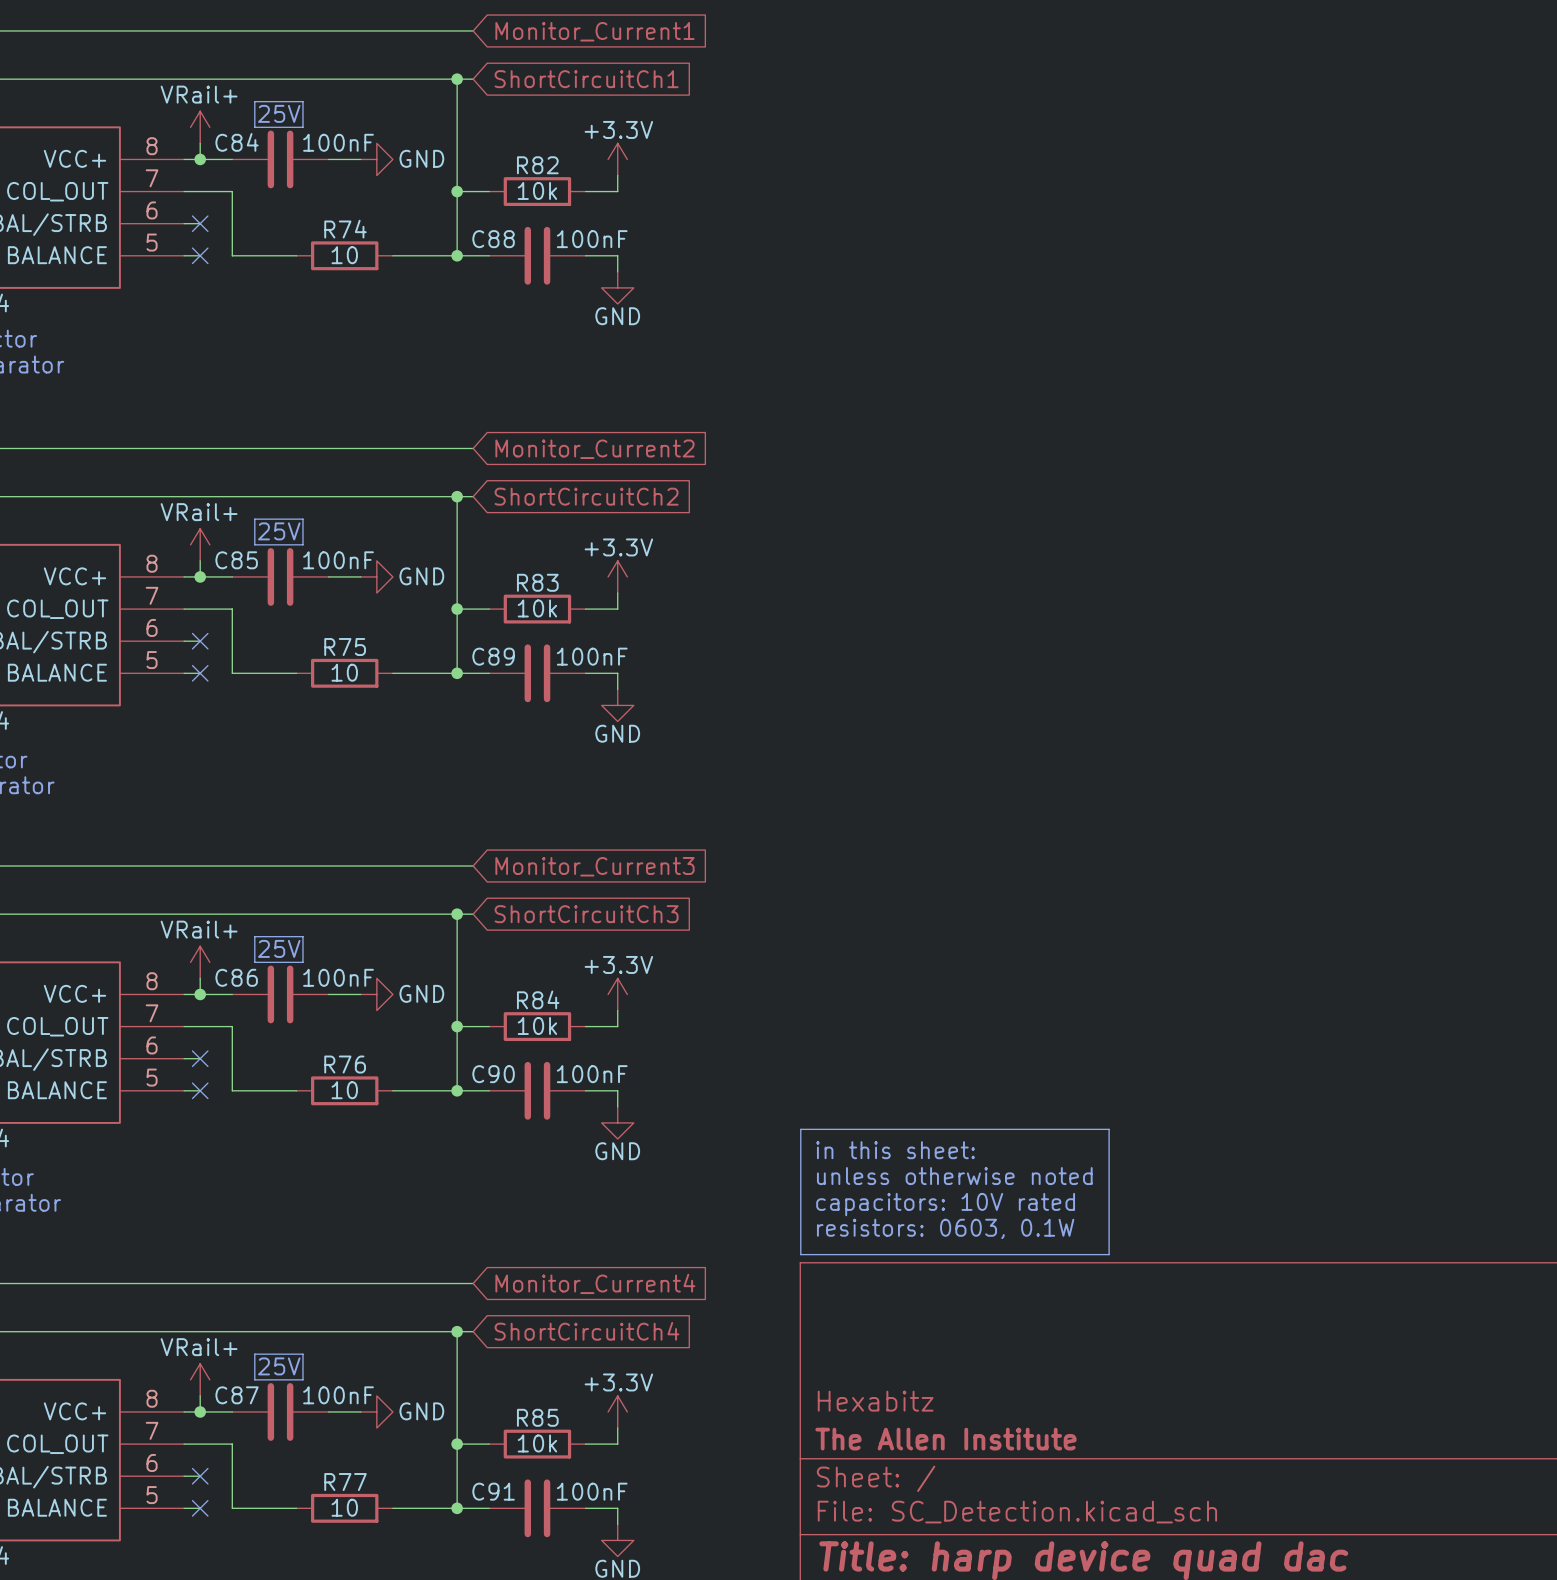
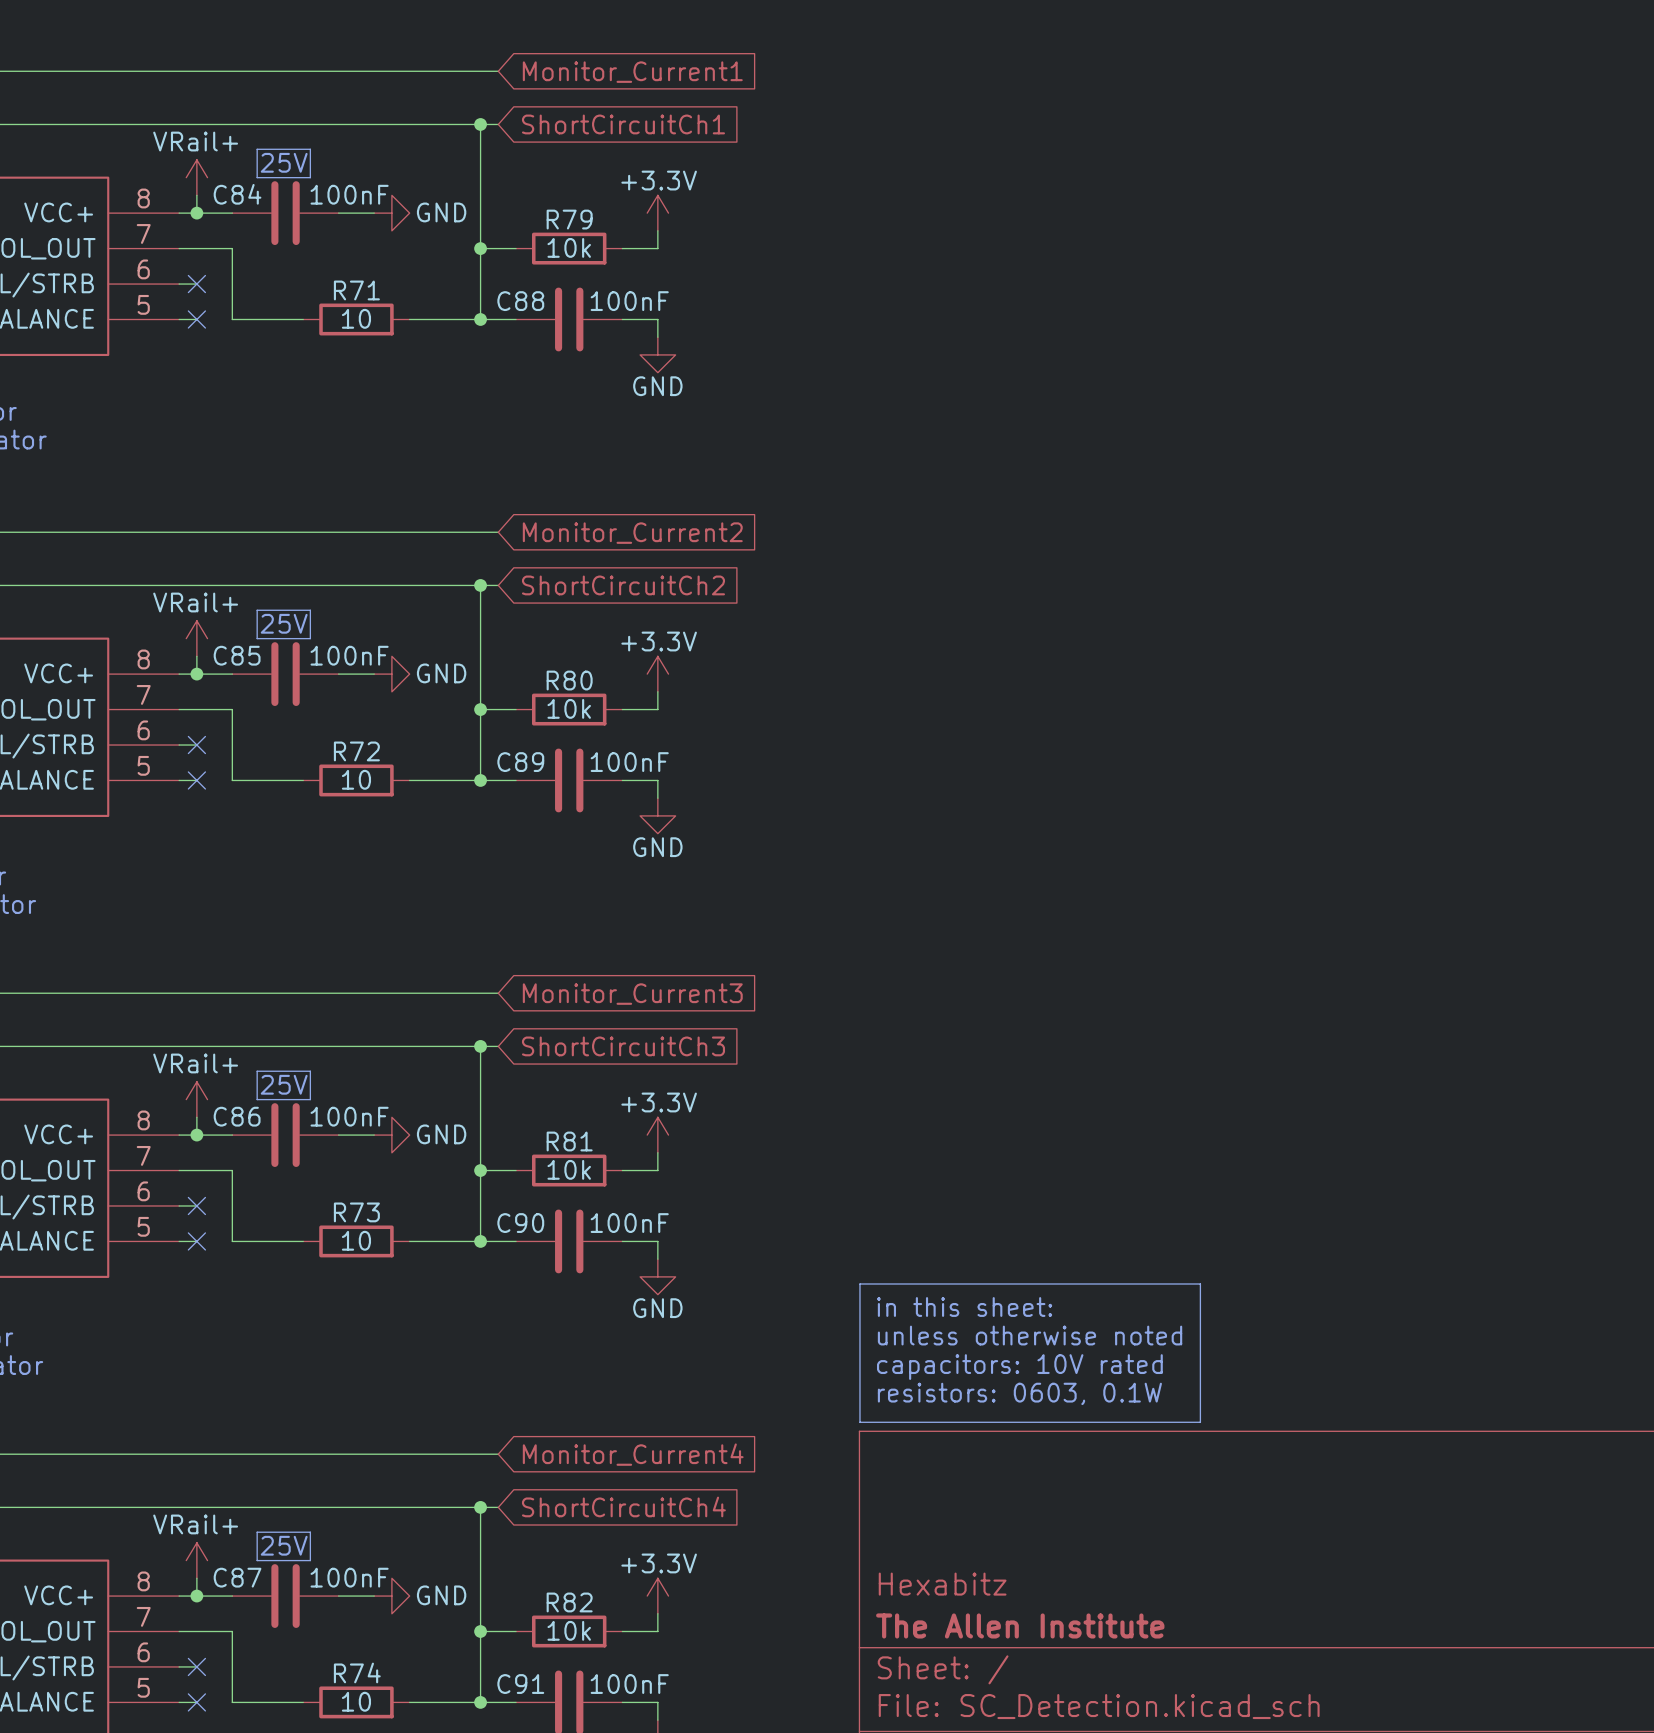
R82 name: R82 (537, 165) -> R79 (569, 219)
R74 name: R74 (345, 229) -> R71 (356, 290)
R83 name: R83 (537, 582) -> R80 (569, 680)
R75 name: R75 (345, 647) -> R72 (356, 751)
R84 name: R84 (538, 999) -> R81 (569, 1141)
R76 name: R76 (345, 1064) -> R73 (356, 1212)
R85 name: R85 (537, 1417) -> R82 (569, 1602)
R77 name: R77 (345, 1482) -> R74 (357, 1672)

